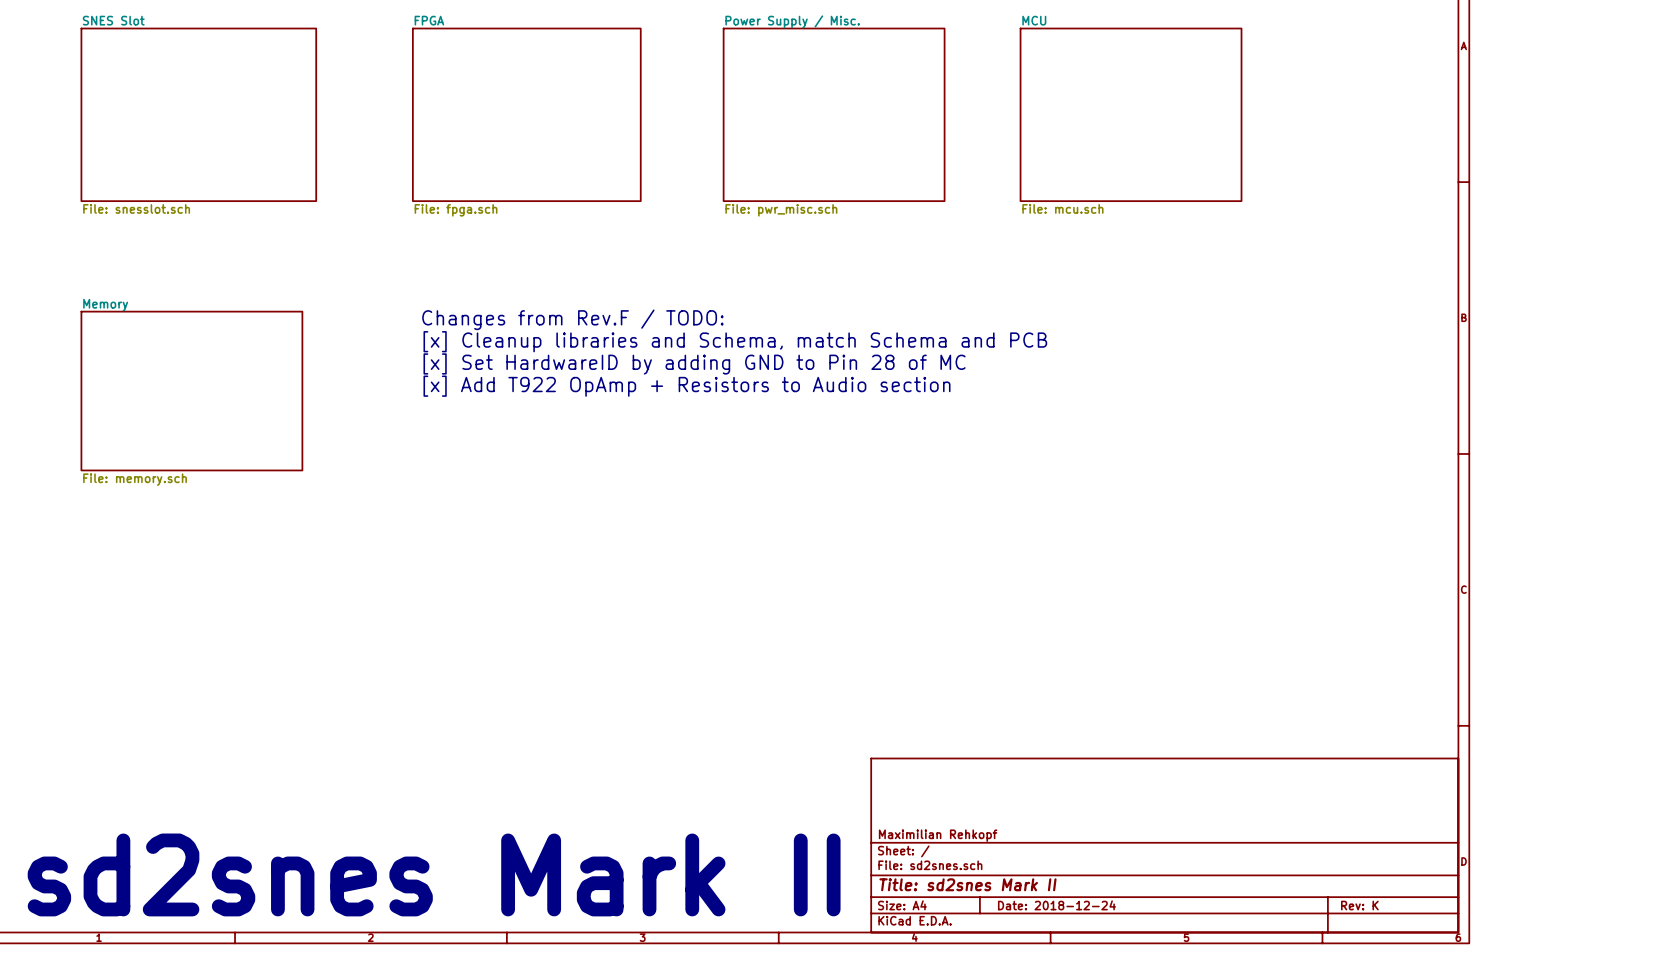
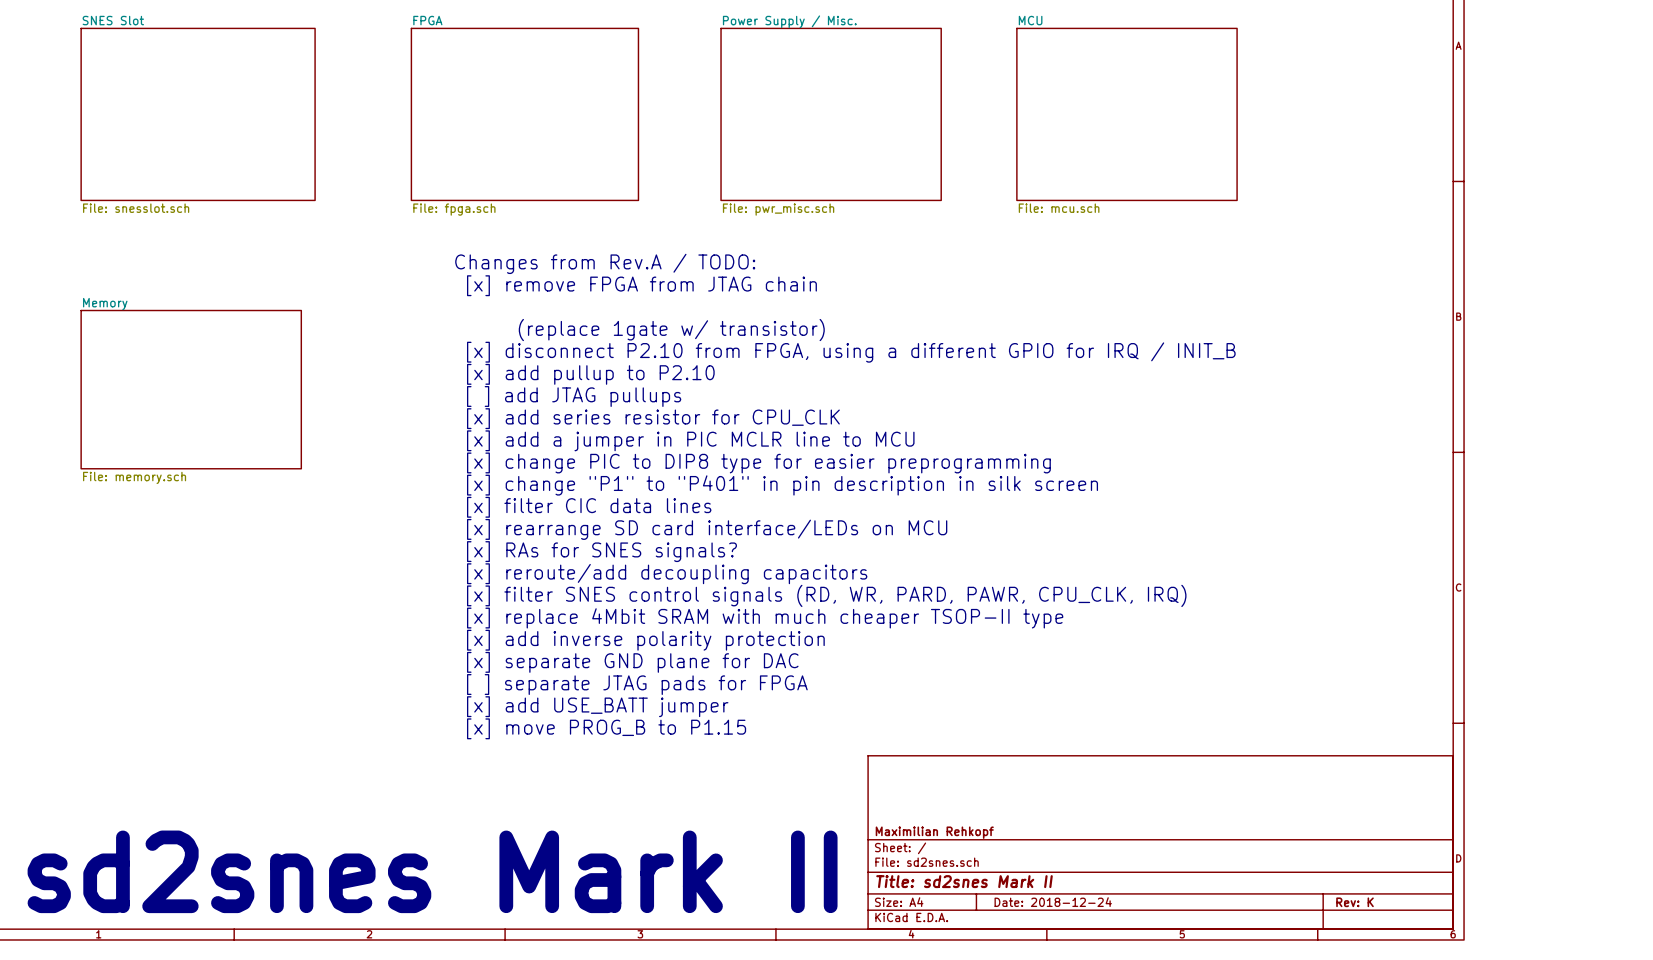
text: none -> Changes from Rev.A / TODO: (605, 263)
text: none -> [x] remove FPGA from JTAG chain (641, 285)
text: Changes from Rev.F / TODO: (572, 319) -> none
text: none -> (replace 1gate w/ transistor) (671, 330)
text: [x] Cleanup libraries and Schema, match Schema and PCB (735, 341) -> none
text: none -> [x] disconnect P2.10 from FPGA, using a different GPIO for IRQ / INIT_B (851, 352)
text: [x] Set HardwareID by adding GND to Pin 28 of MC (694, 363) -> none
text: none -> [x] add pullup to P2.10 (590, 374)
text: [x] Add T922 OpAmp + Resistors to Audio section (687, 386) -> none
text: none -> [ ] add JTAG pullups (574, 396)
text: none -> [x] add series resistor for CPU_CLK (653, 418)
text: none -> [x] add a jumper in PIC MCLR line to MCU (690, 440)
text: none -> [x] change PIC to DIP8 type for easier preprogramming (758, 462)
text: none -> [x] change "P1" to "P401" in pin description in silk screen (782, 485)
text: none -> [x] filter CIC data lines (589, 507)
text: none -> [x] rearrange SD card interface/LEDs on MCU (707, 529)
text: none -> [x] RAs for SNES signals? (601, 551)
text: none -> [x] reroute/add decoupling capacitors (667, 573)
text: none -> [x] filter SNES control signals (RD, WR, PARD, PAWR, CPU_CLK, IRQ) (826, 595)
text: none -> [x] replace 4Mbit SRAM with much cheaper TSOP-II type (765, 618)
text: none -> [x] add inverse polarity protection (645, 640)
text: none -> [x] separate GND plane for DAC (632, 662)
text: none -> [ ] separate JTAG pads for FPGA (637, 684)
text: none -> [x] add USE_BATT jumper (597, 706)
text: none -> [x] move PROG_B to P1.15 (606, 728)

